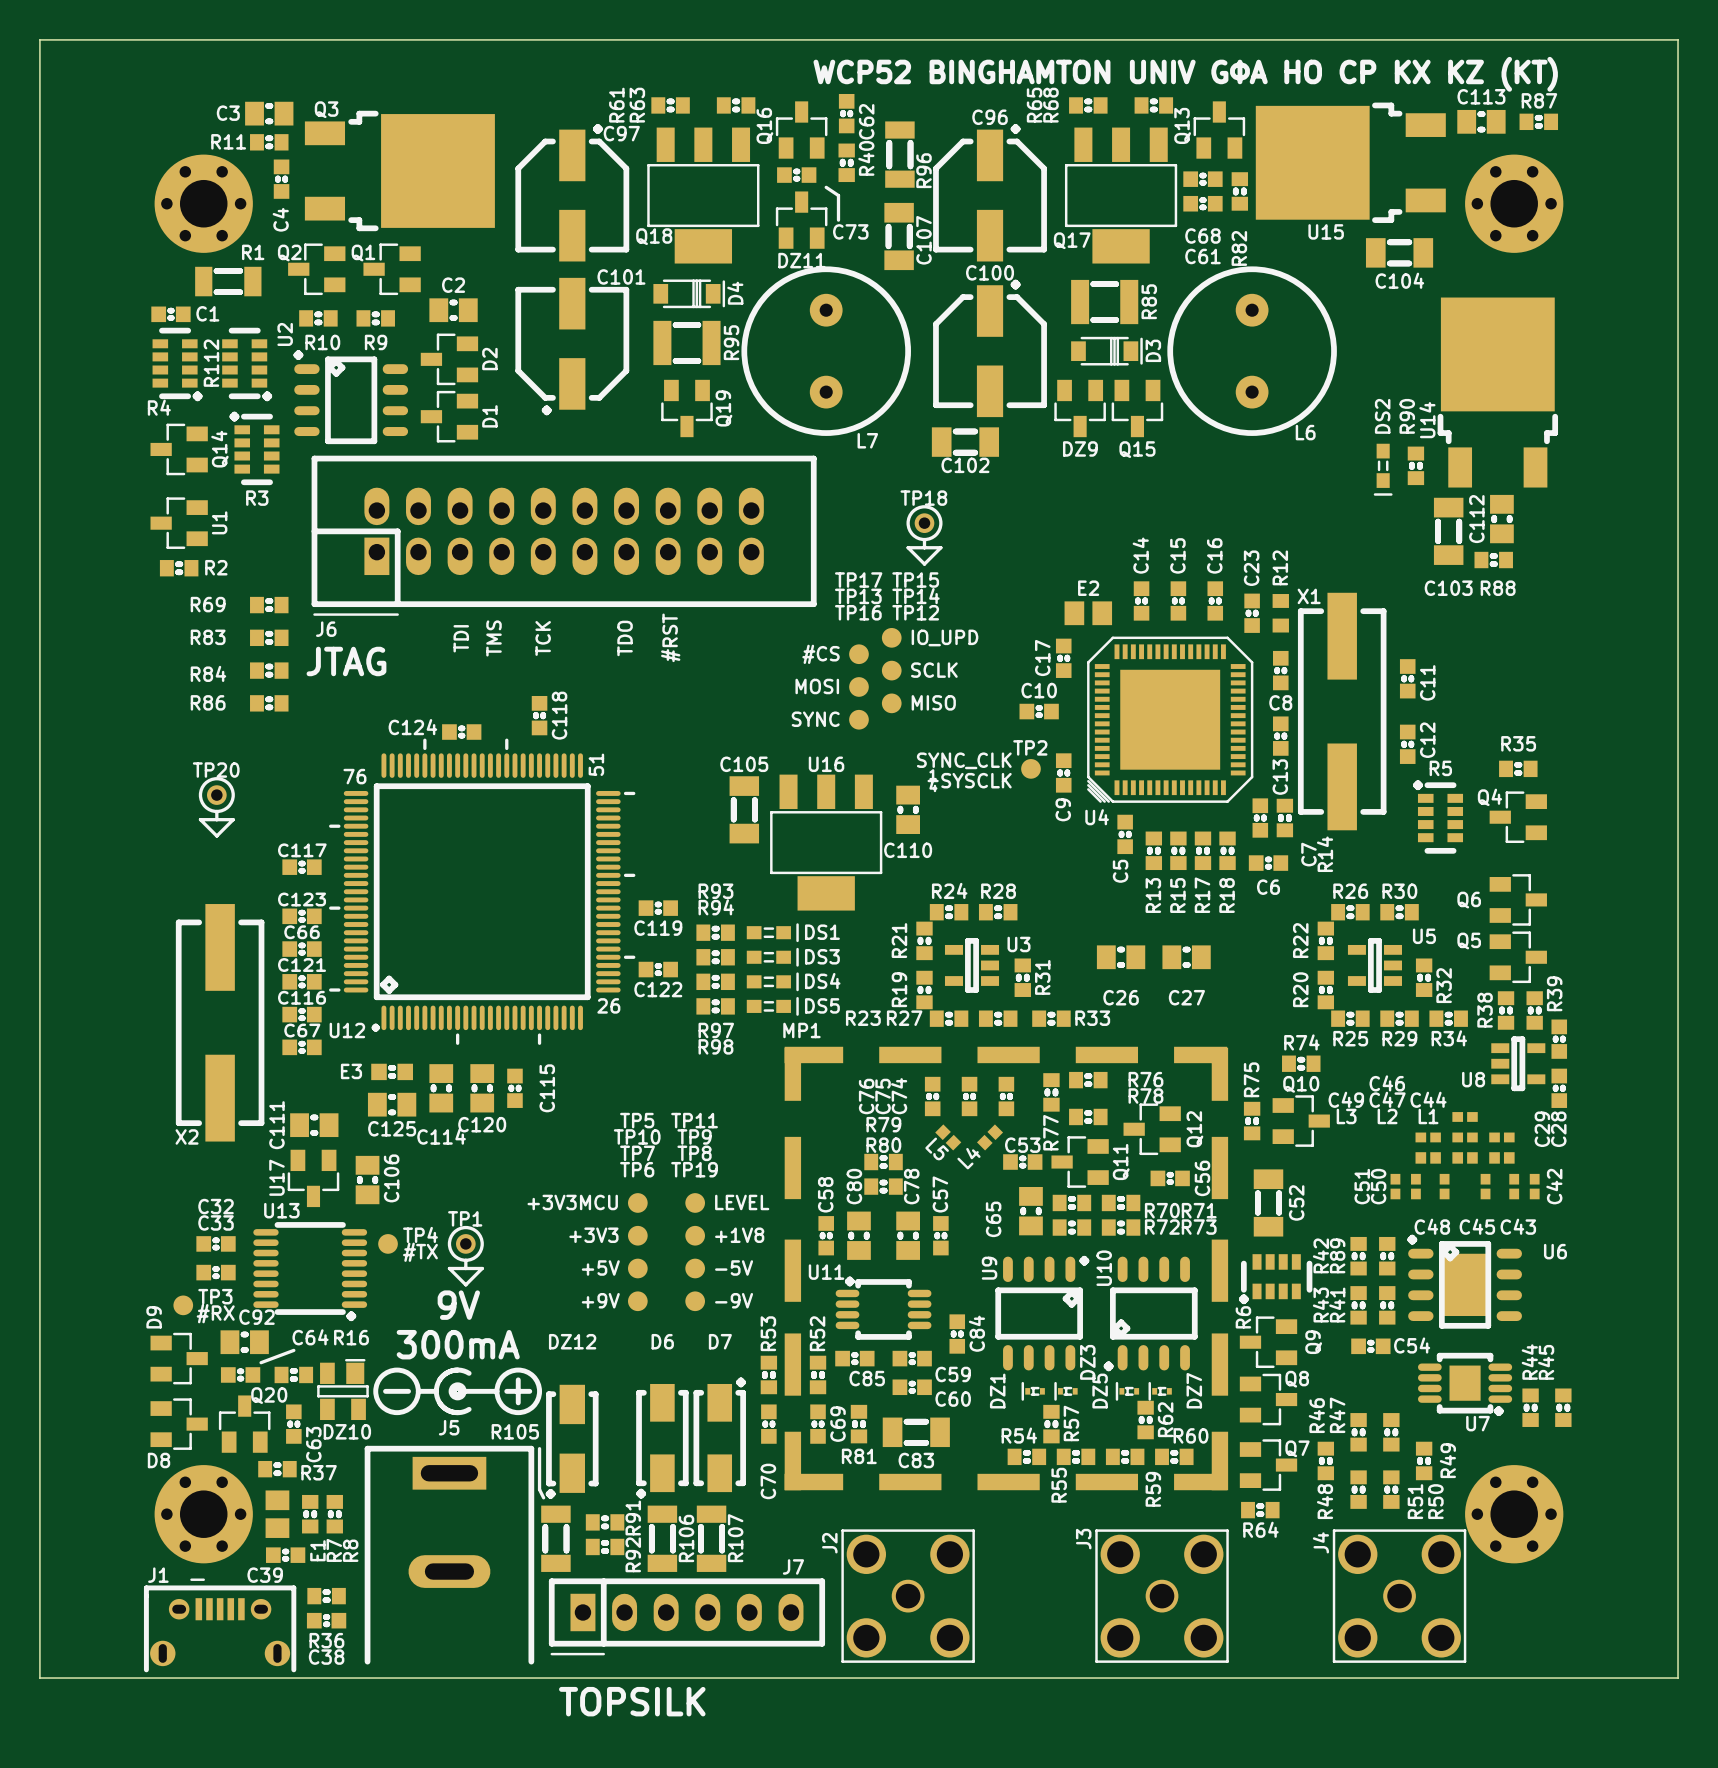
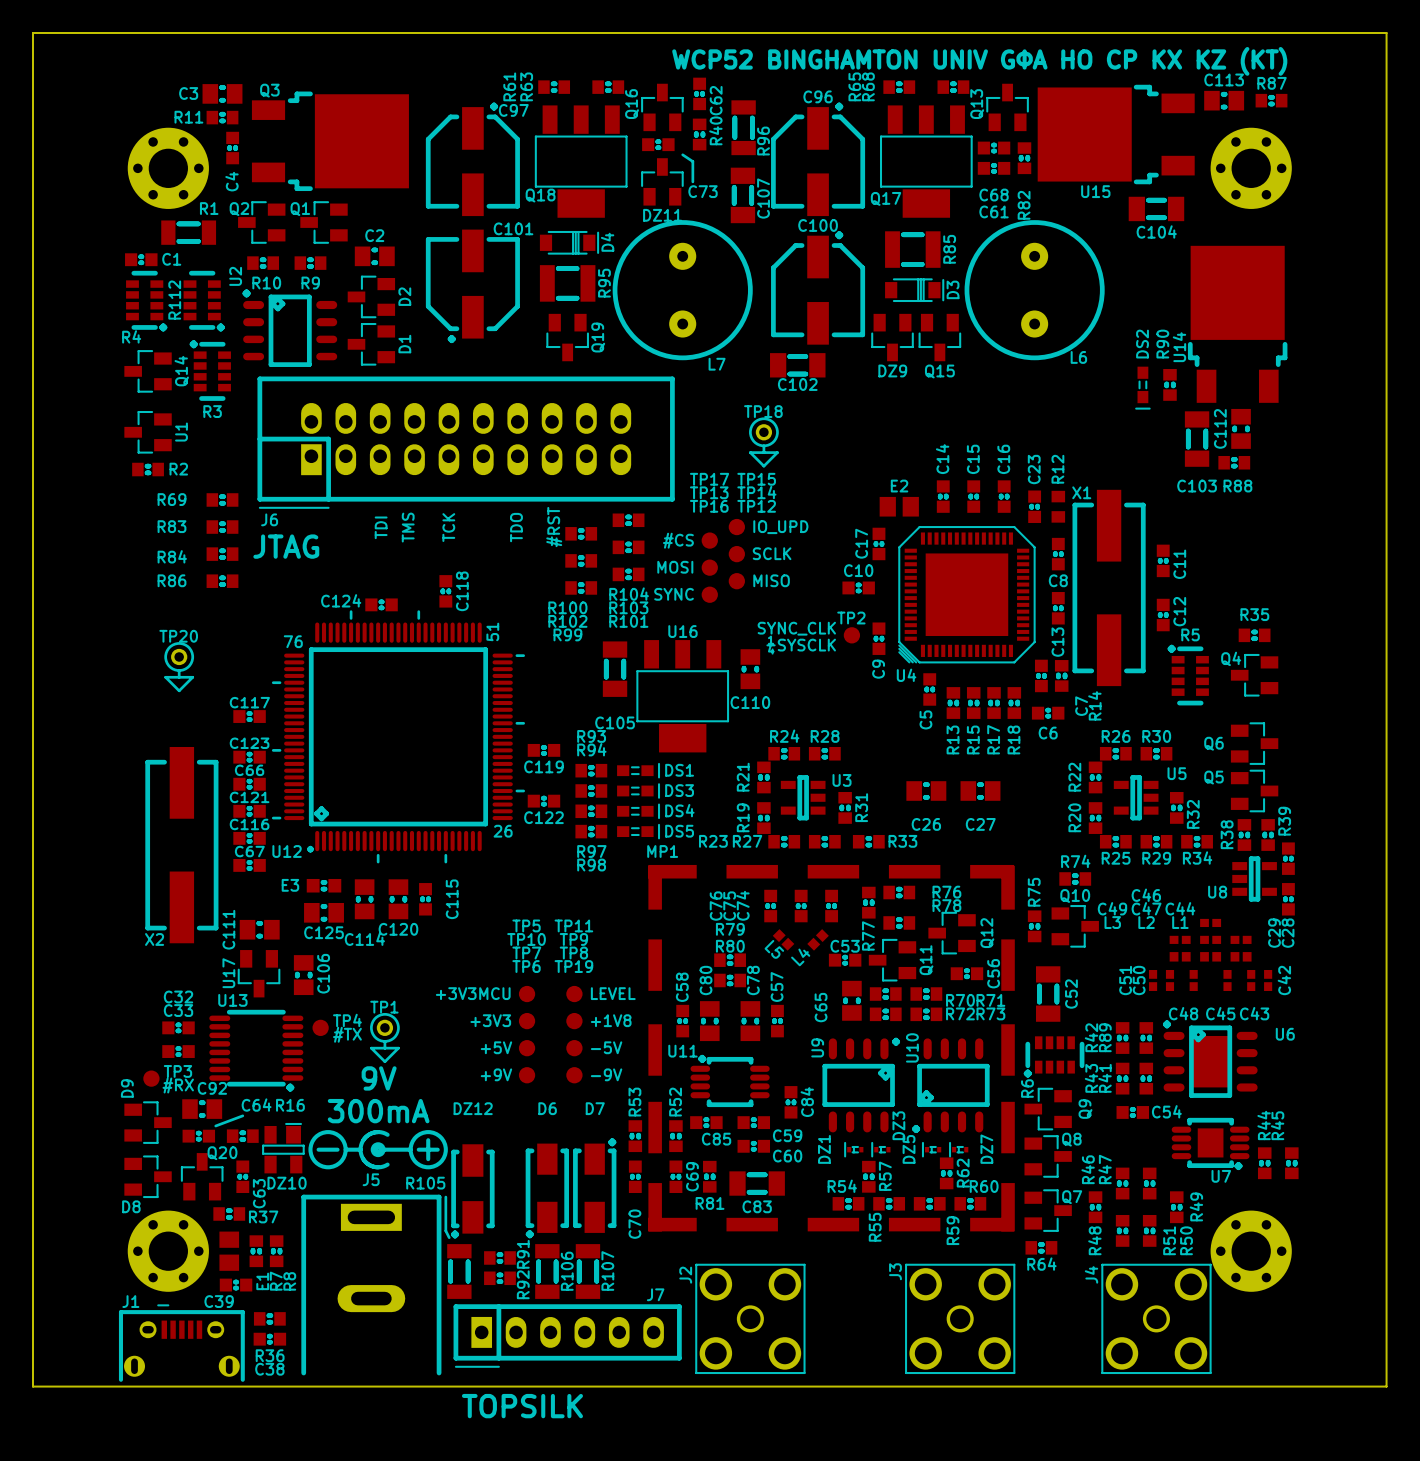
R104: none -> (628, 520)
R100: none -> (581, 533)
R103: none -> (628, 547)
R102: none -> (581, 560)
R101: none -> (628, 574)
R99: none -> (581, 587)
C105 name position: C105 (744, 764) -> C105 (615, 722)

